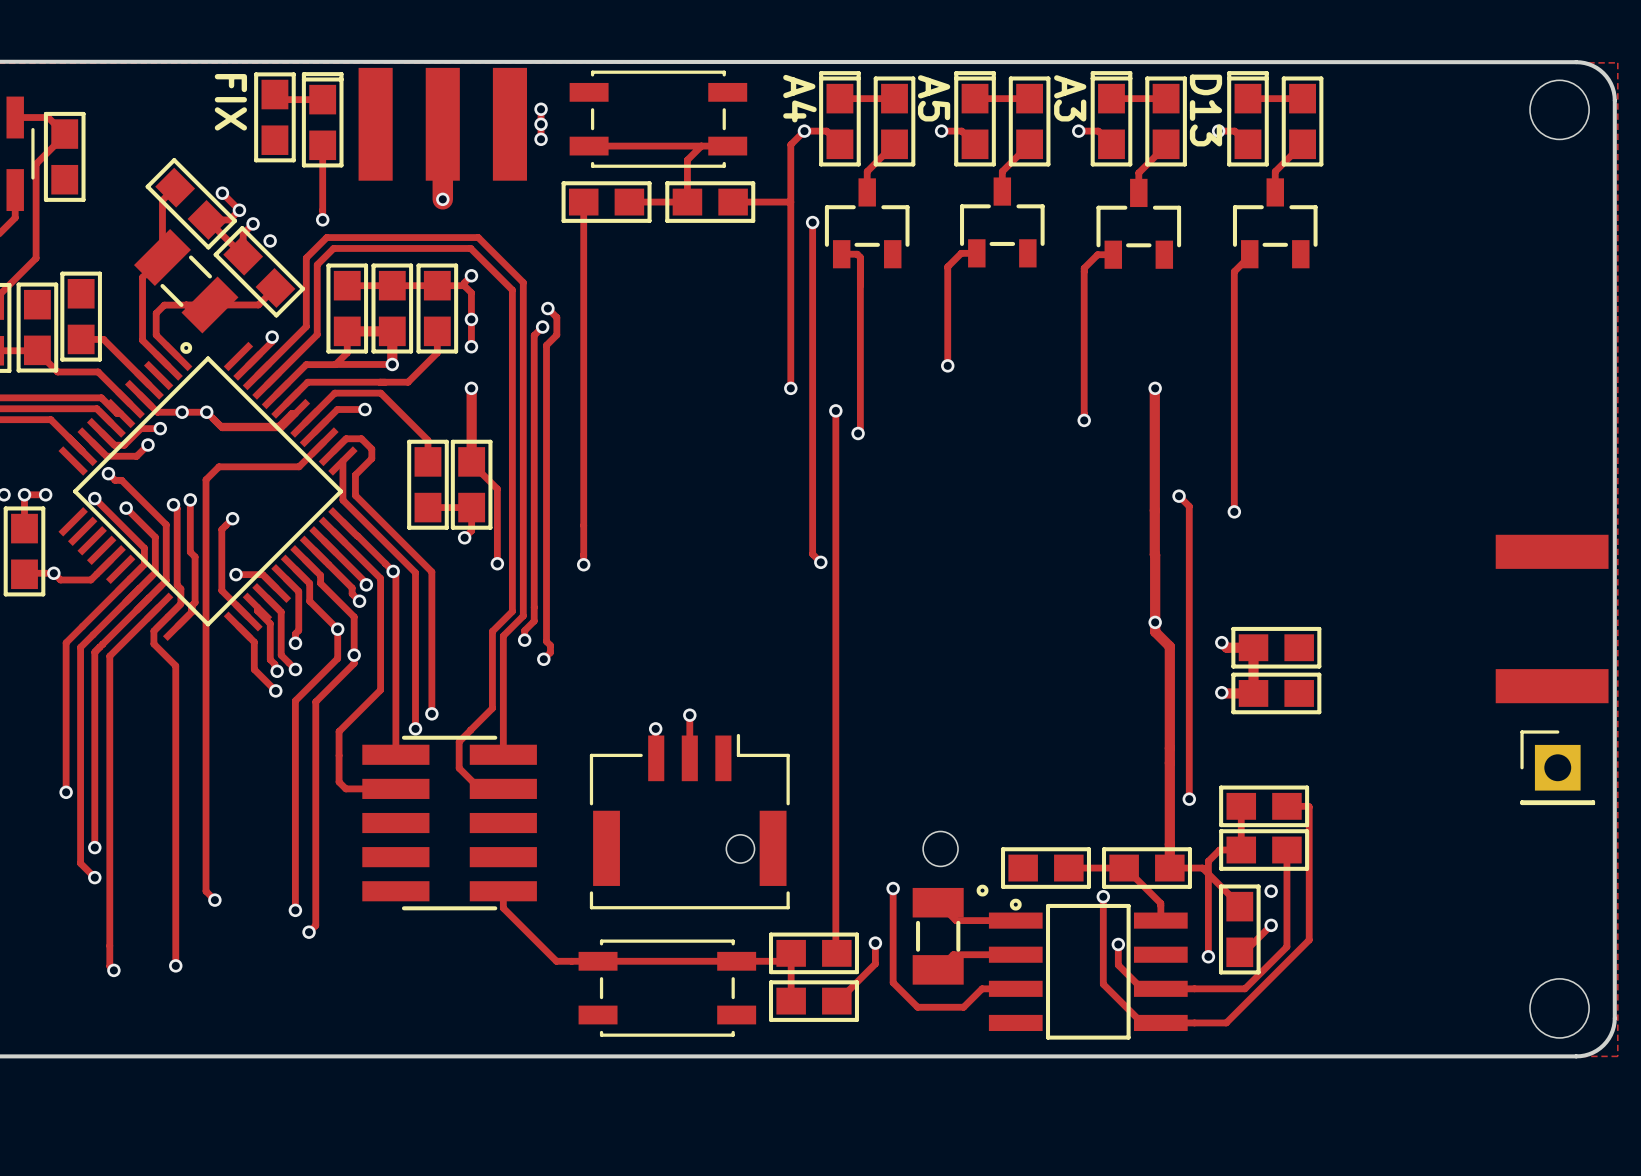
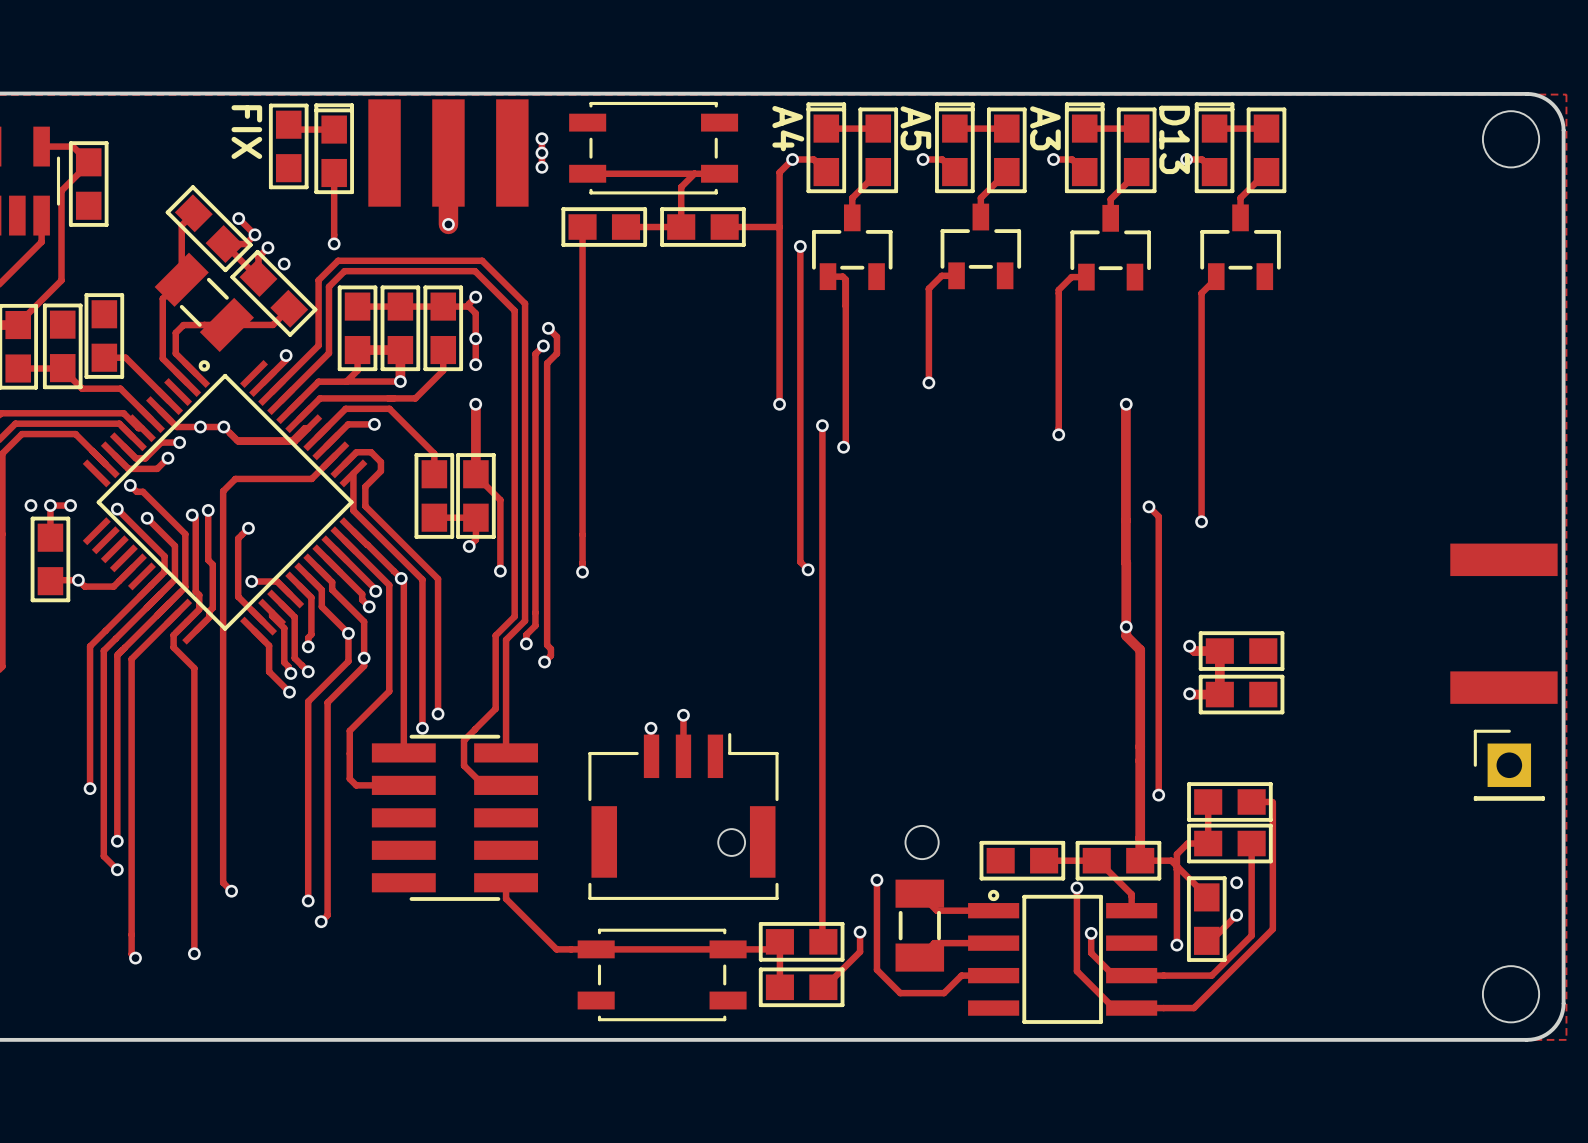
drawing: [976, 884, 989, 897] -> none

